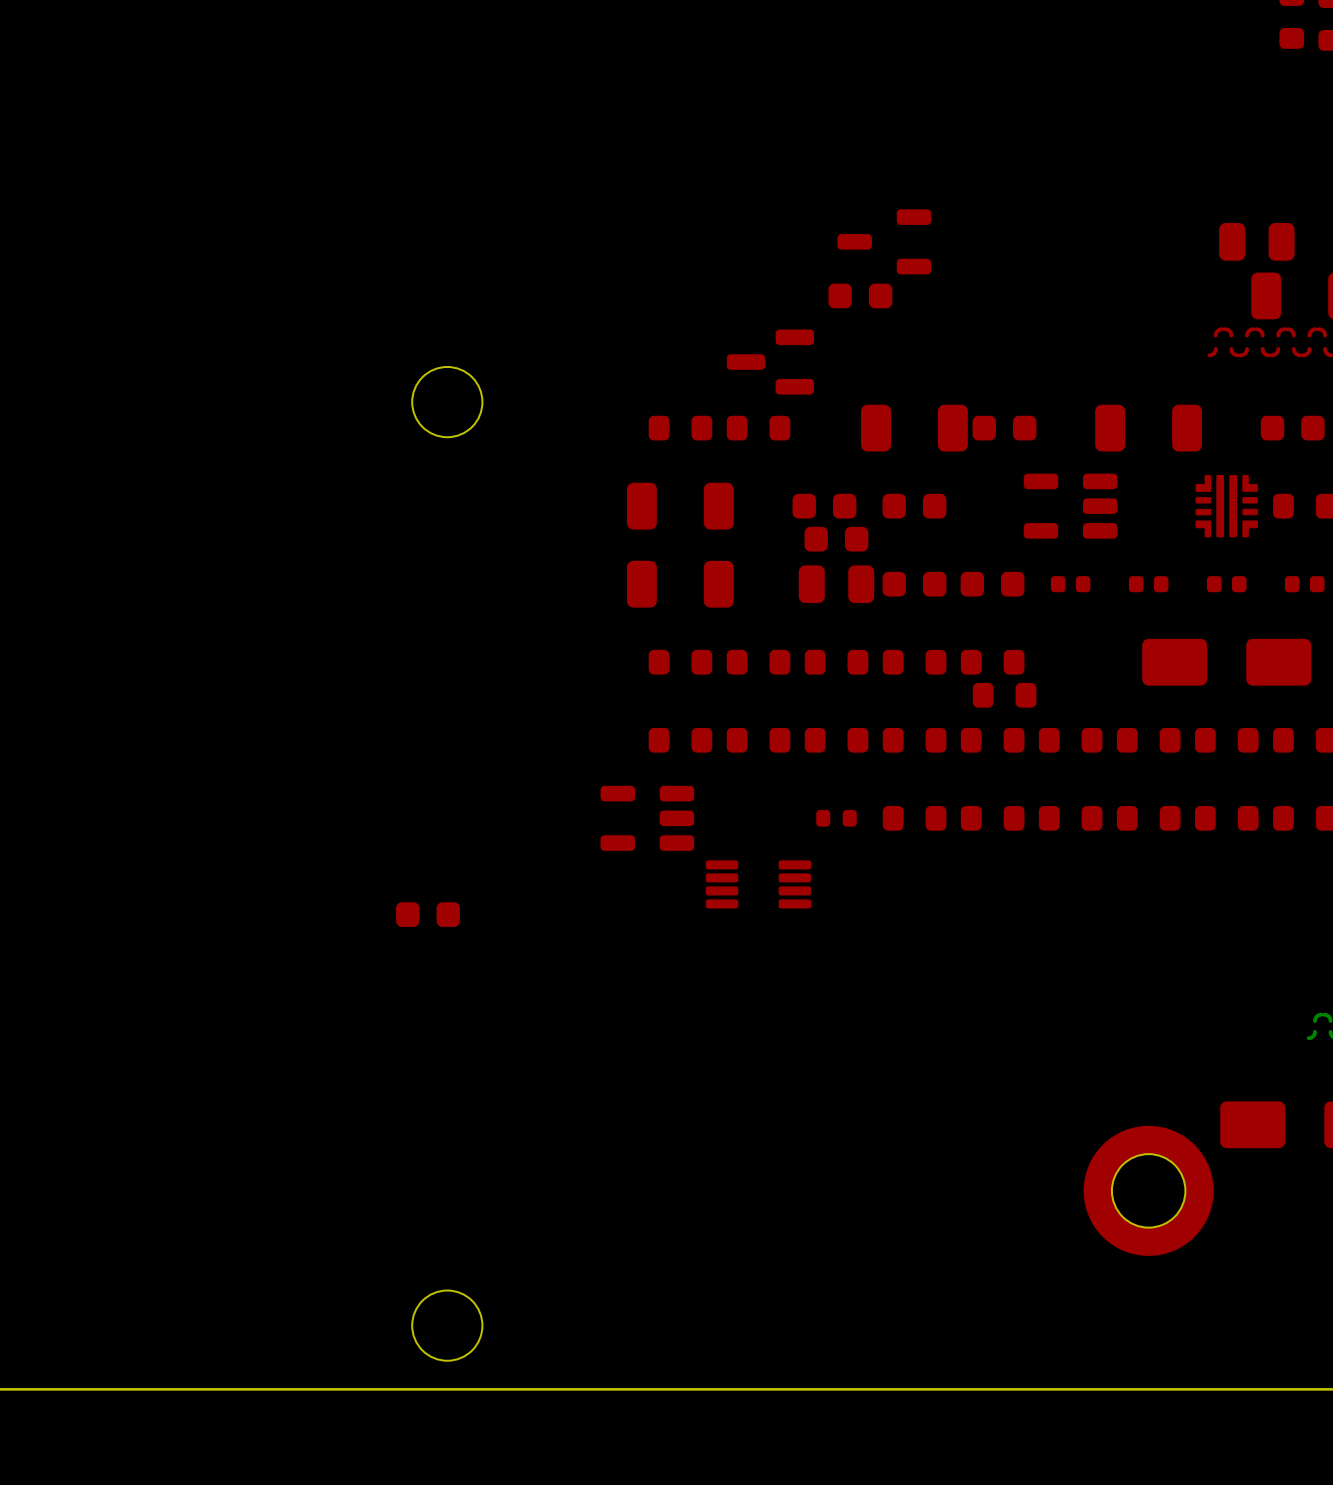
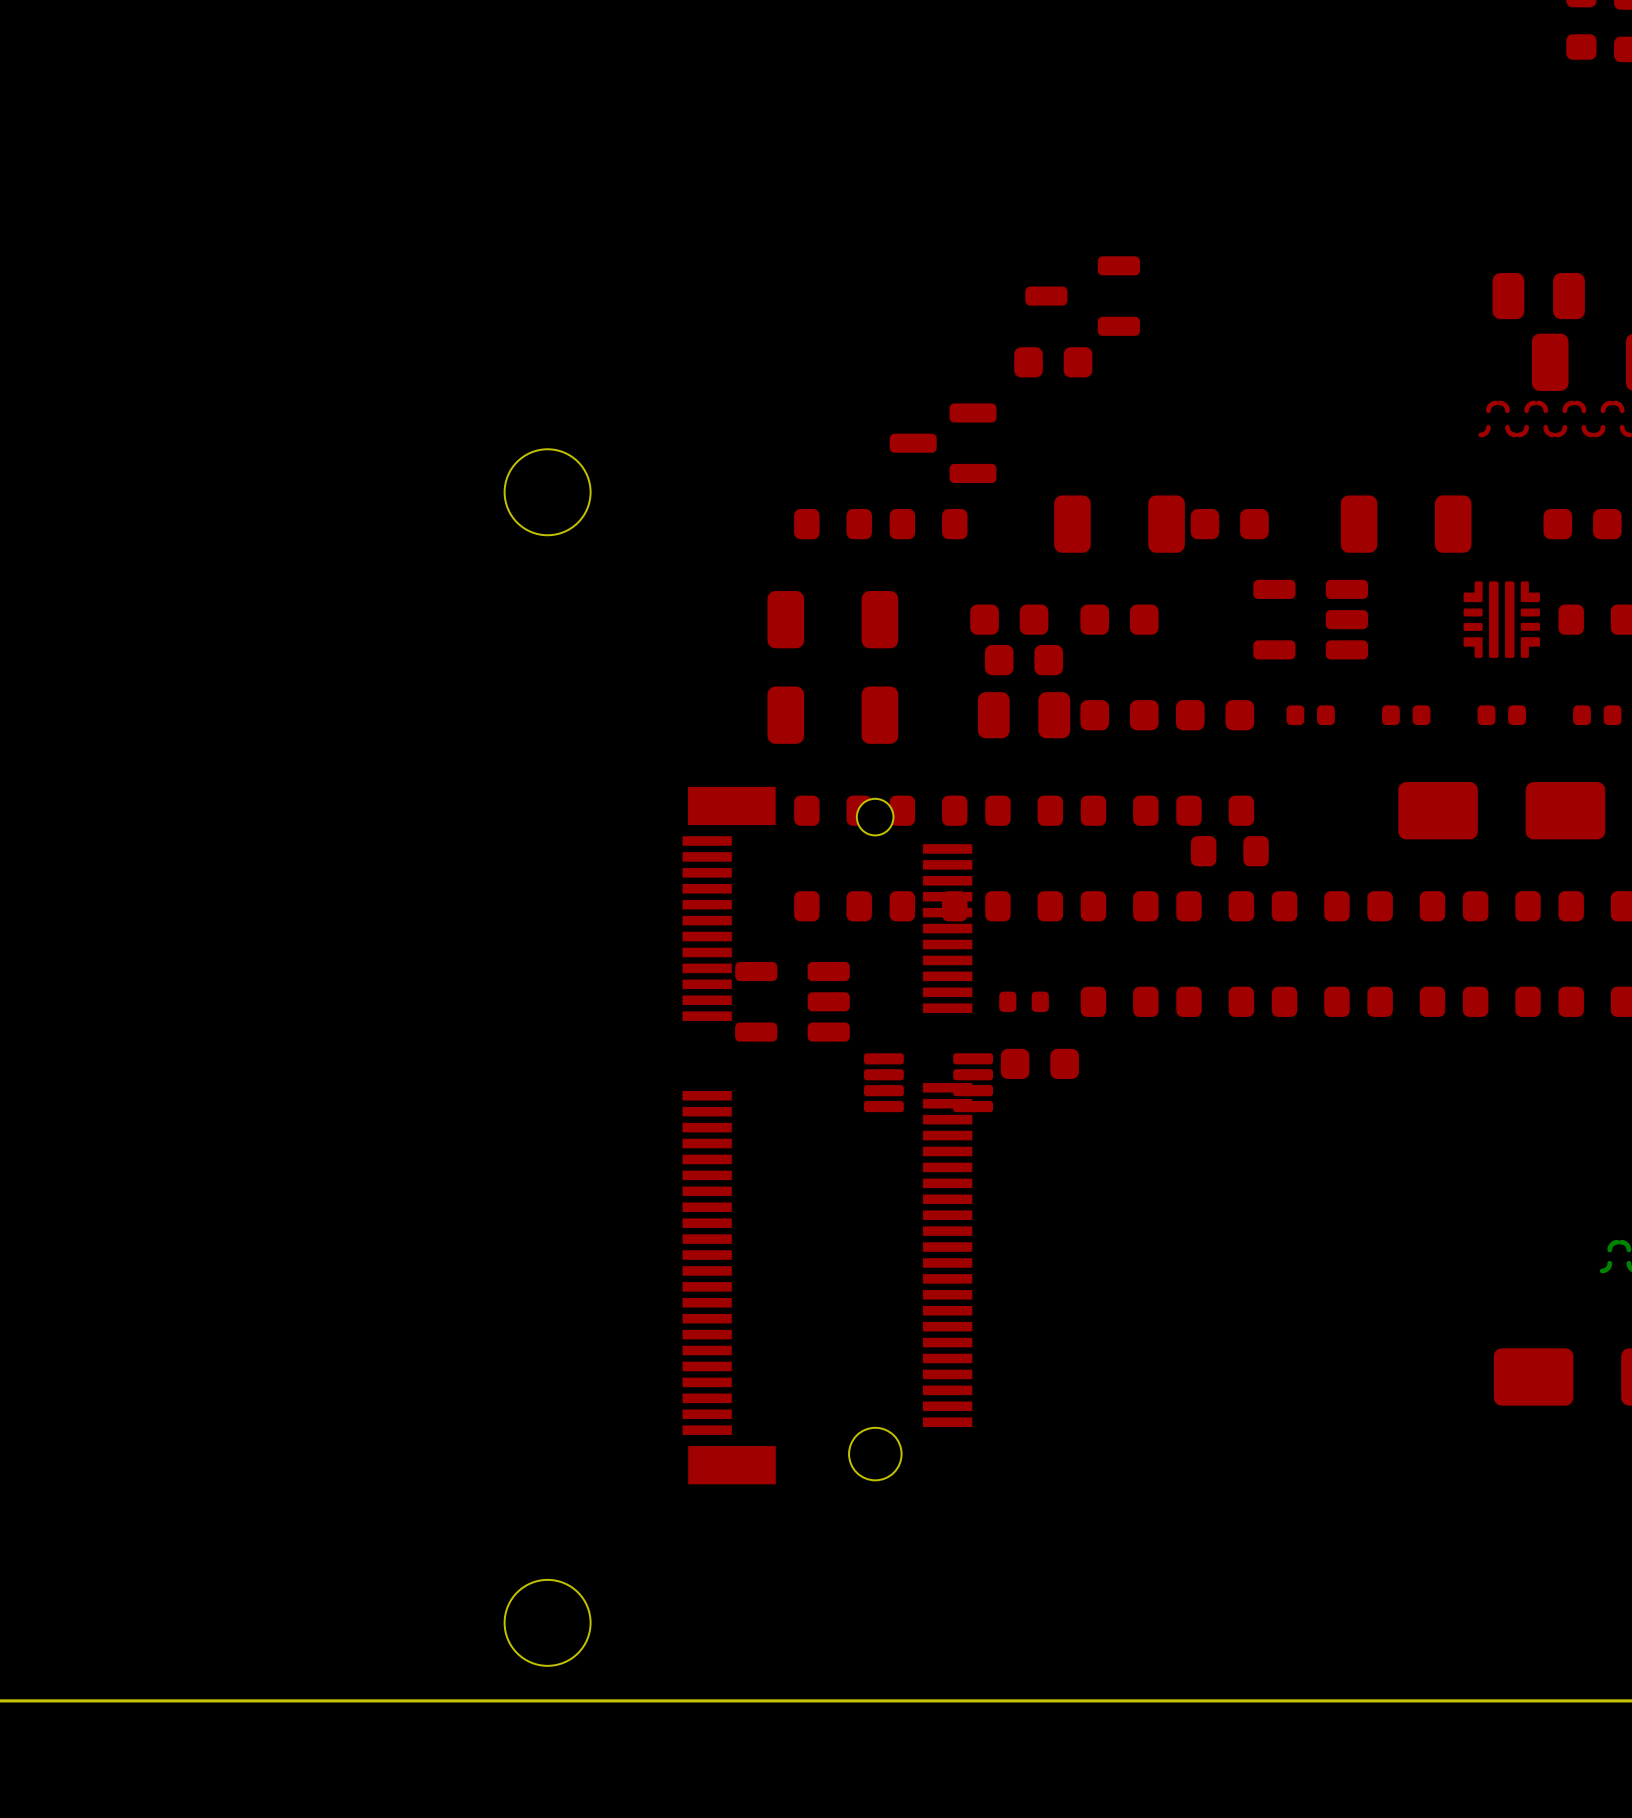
part position: (427, 914) -> (1039, 1063)
part: none -> (827, 1135)
part: (1148, 1190) -> none

